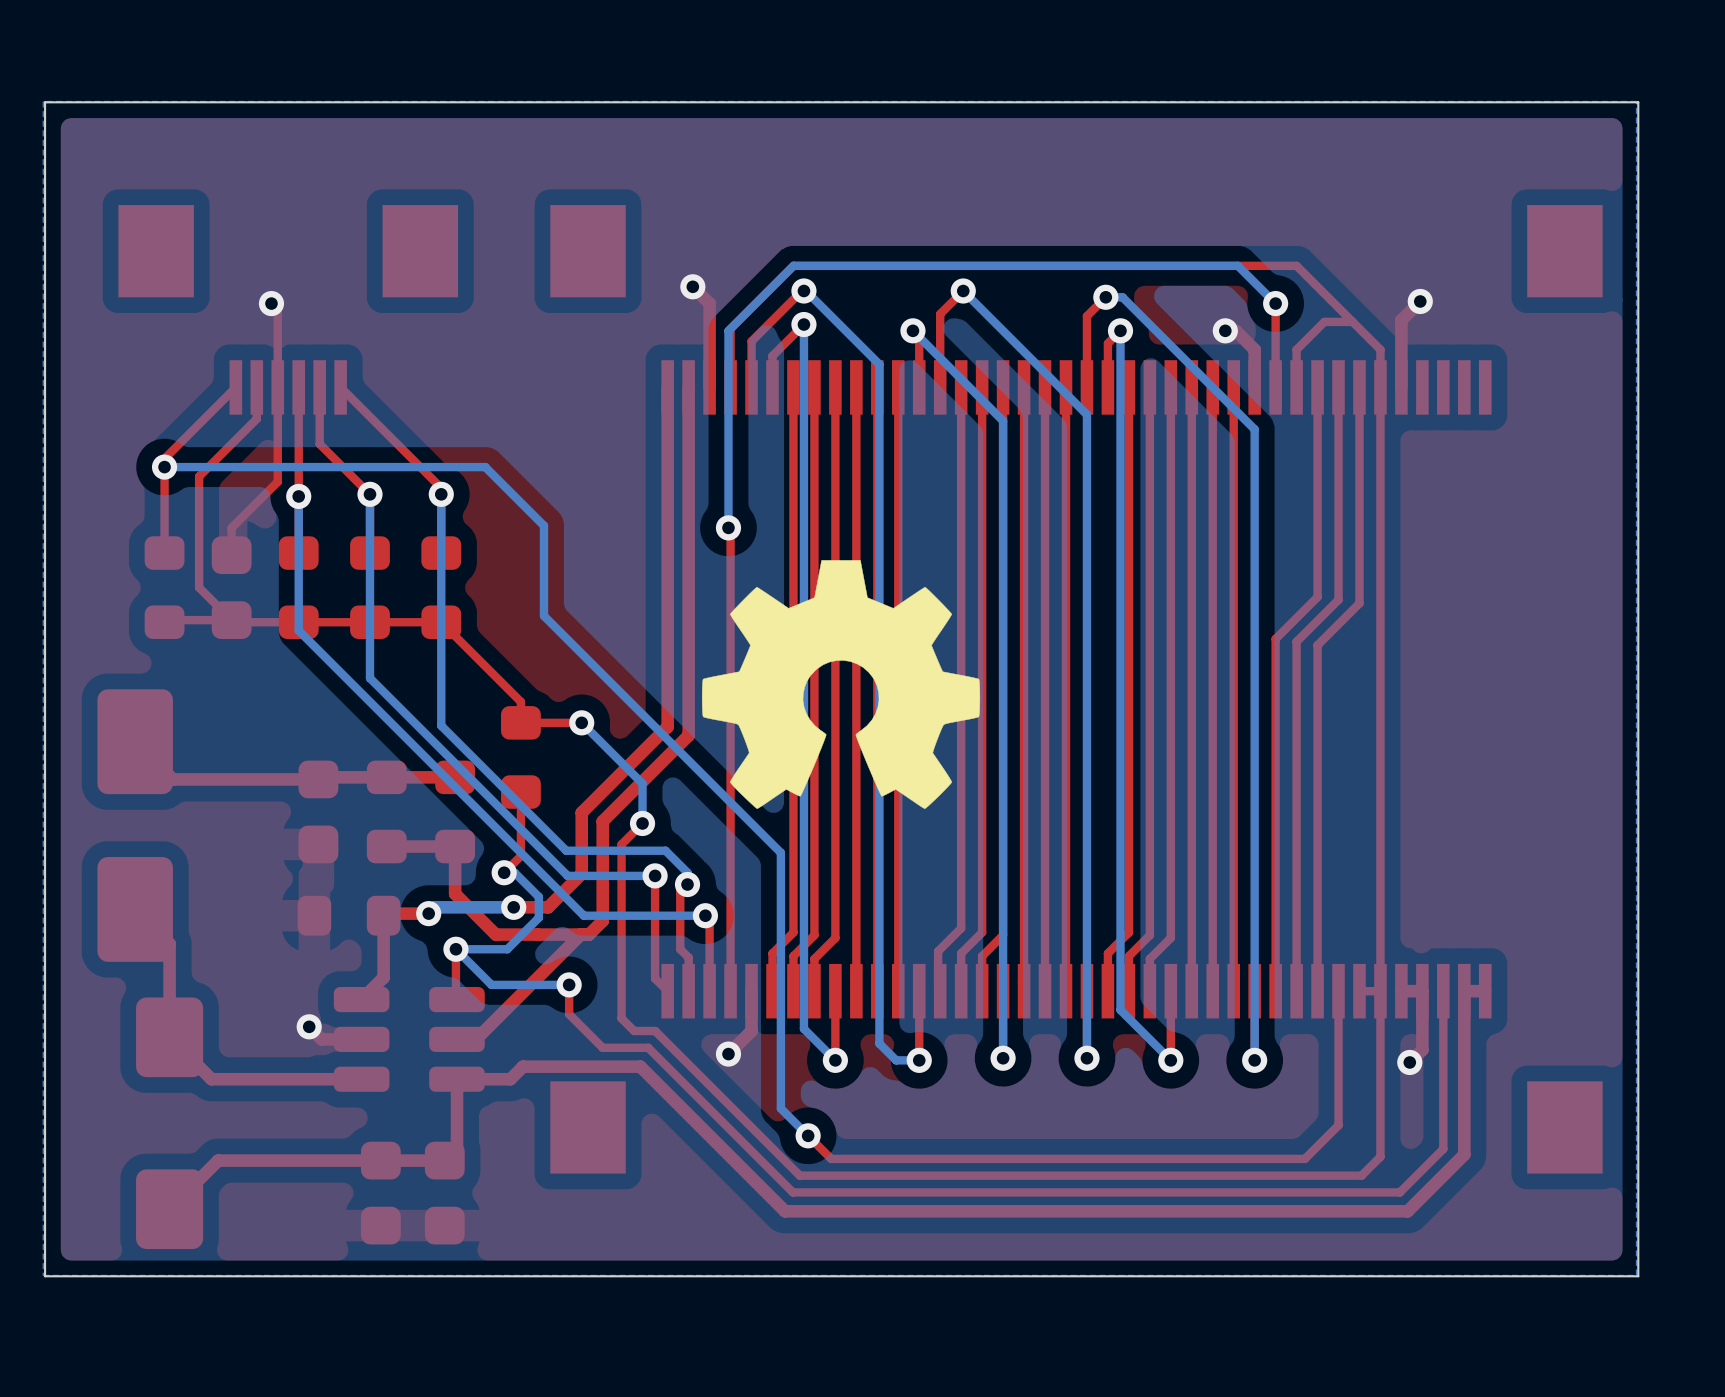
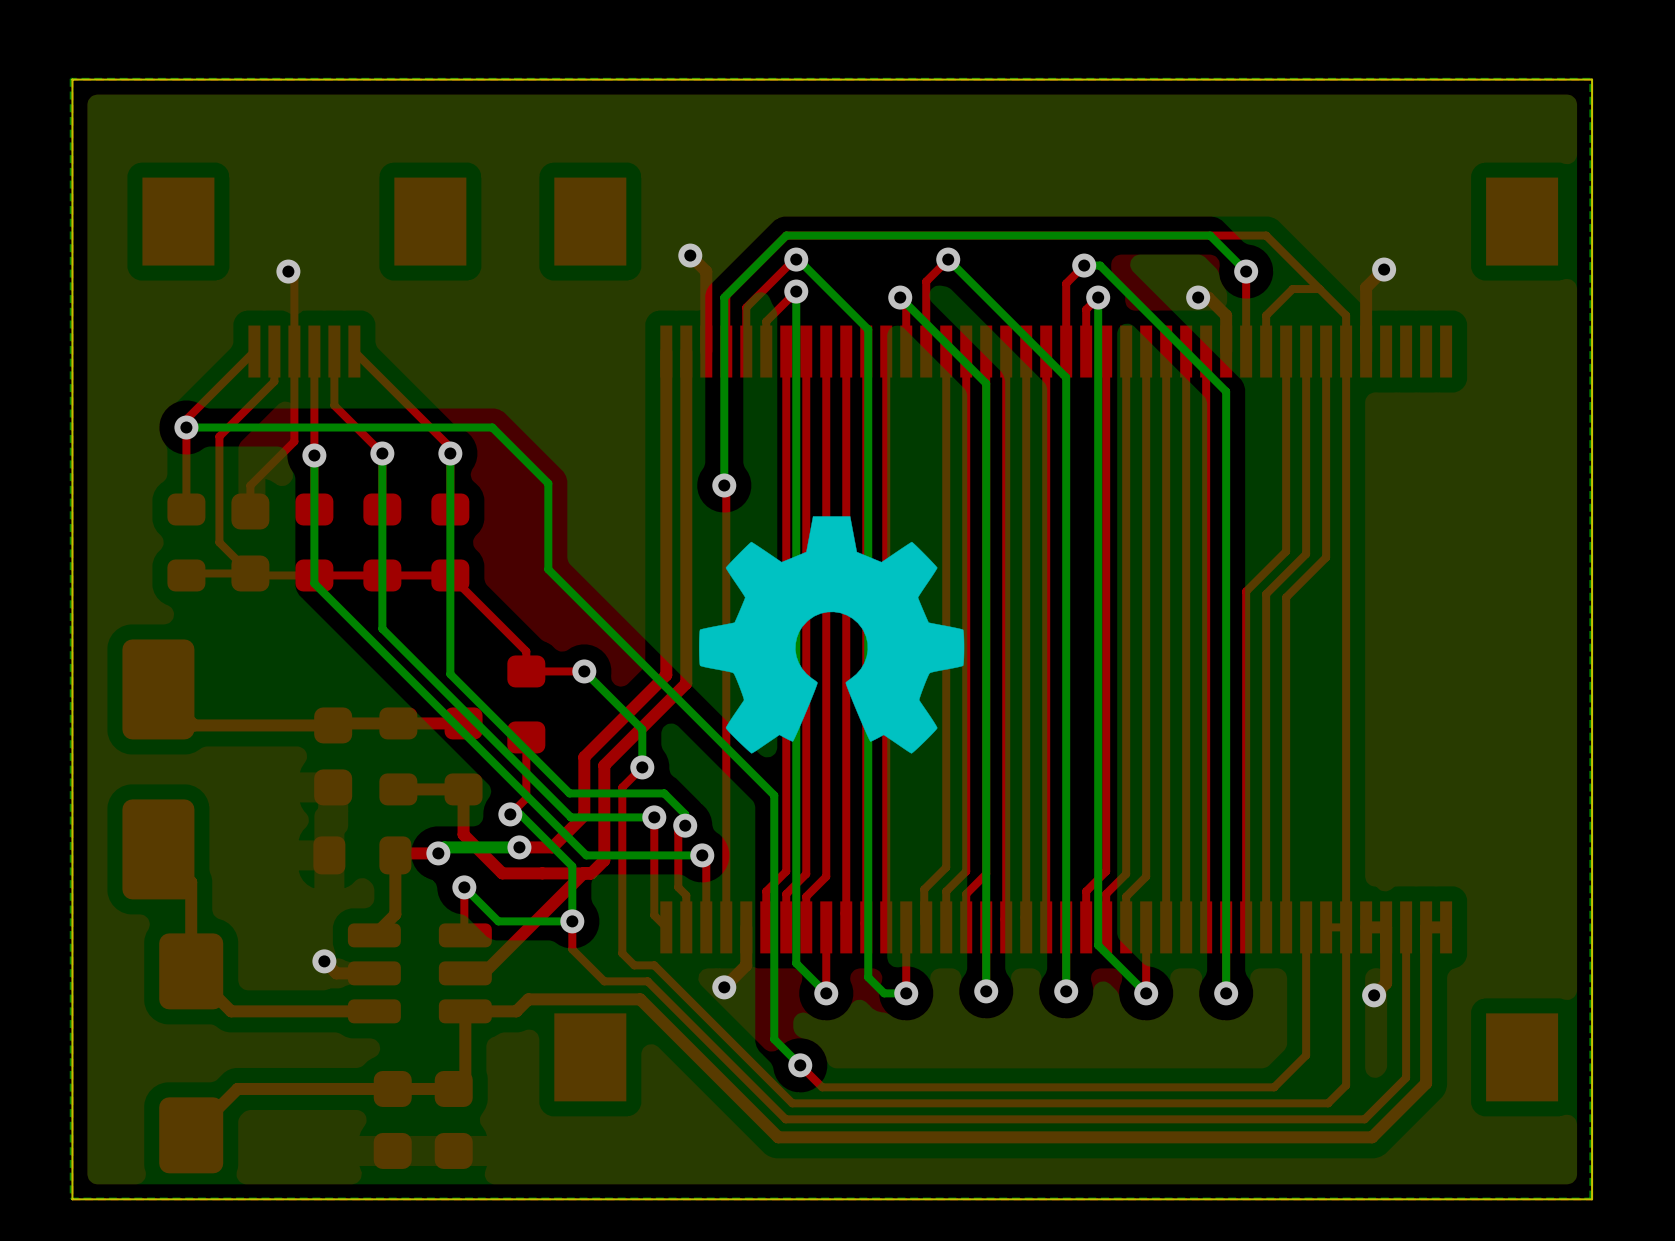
bottom track: (538, 896) (538, 917) (507, 949) (455, 949) -> (543, 837) (572, 866) (572, 921)

